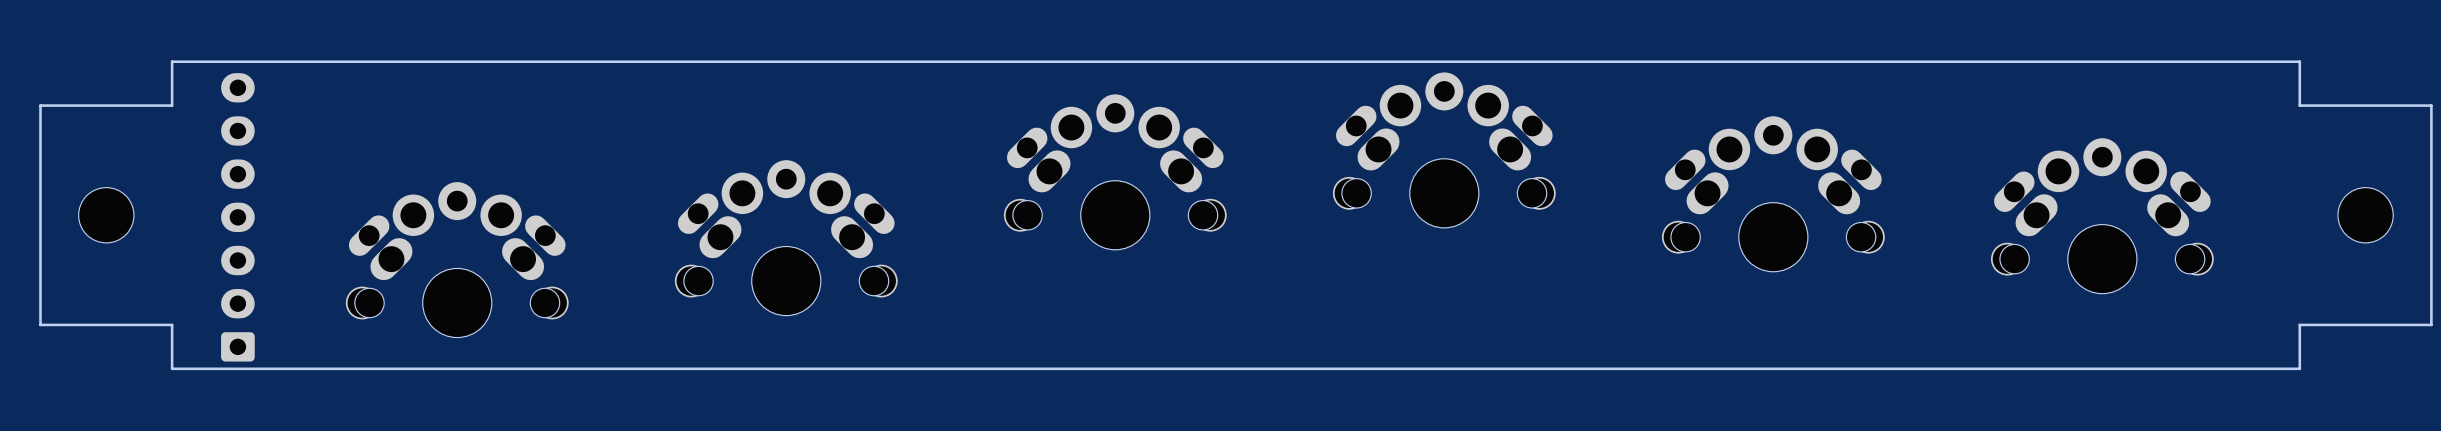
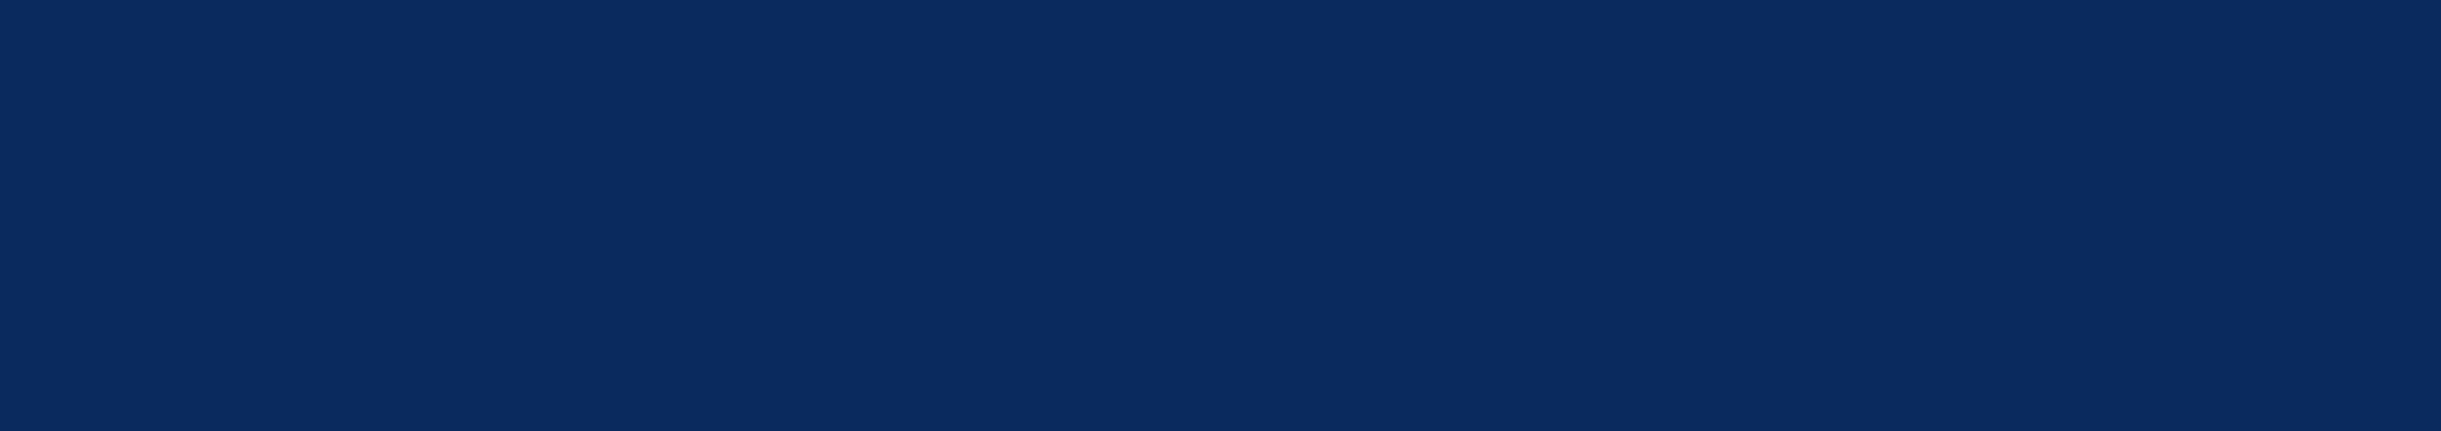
board edge: (2299, 61) (2299, 105) (2431, 105) (2431, 324) (2299, 324) (2299, 368) (172, 368) (172, 324) (40, 324) (40, 105) (172, 105) (172, 61) (2299, 61) -> none
part: (1444, 150) -> none
part: (1115, 172) -> none
part: (1773, 194) -> none
part: (106, 215) -> none
part: (2102, 215) -> none
part: (2365, 215) -> none
part: (237, 217) -> none
part: (786, 237) -> none
part: (457, 259) -> none

